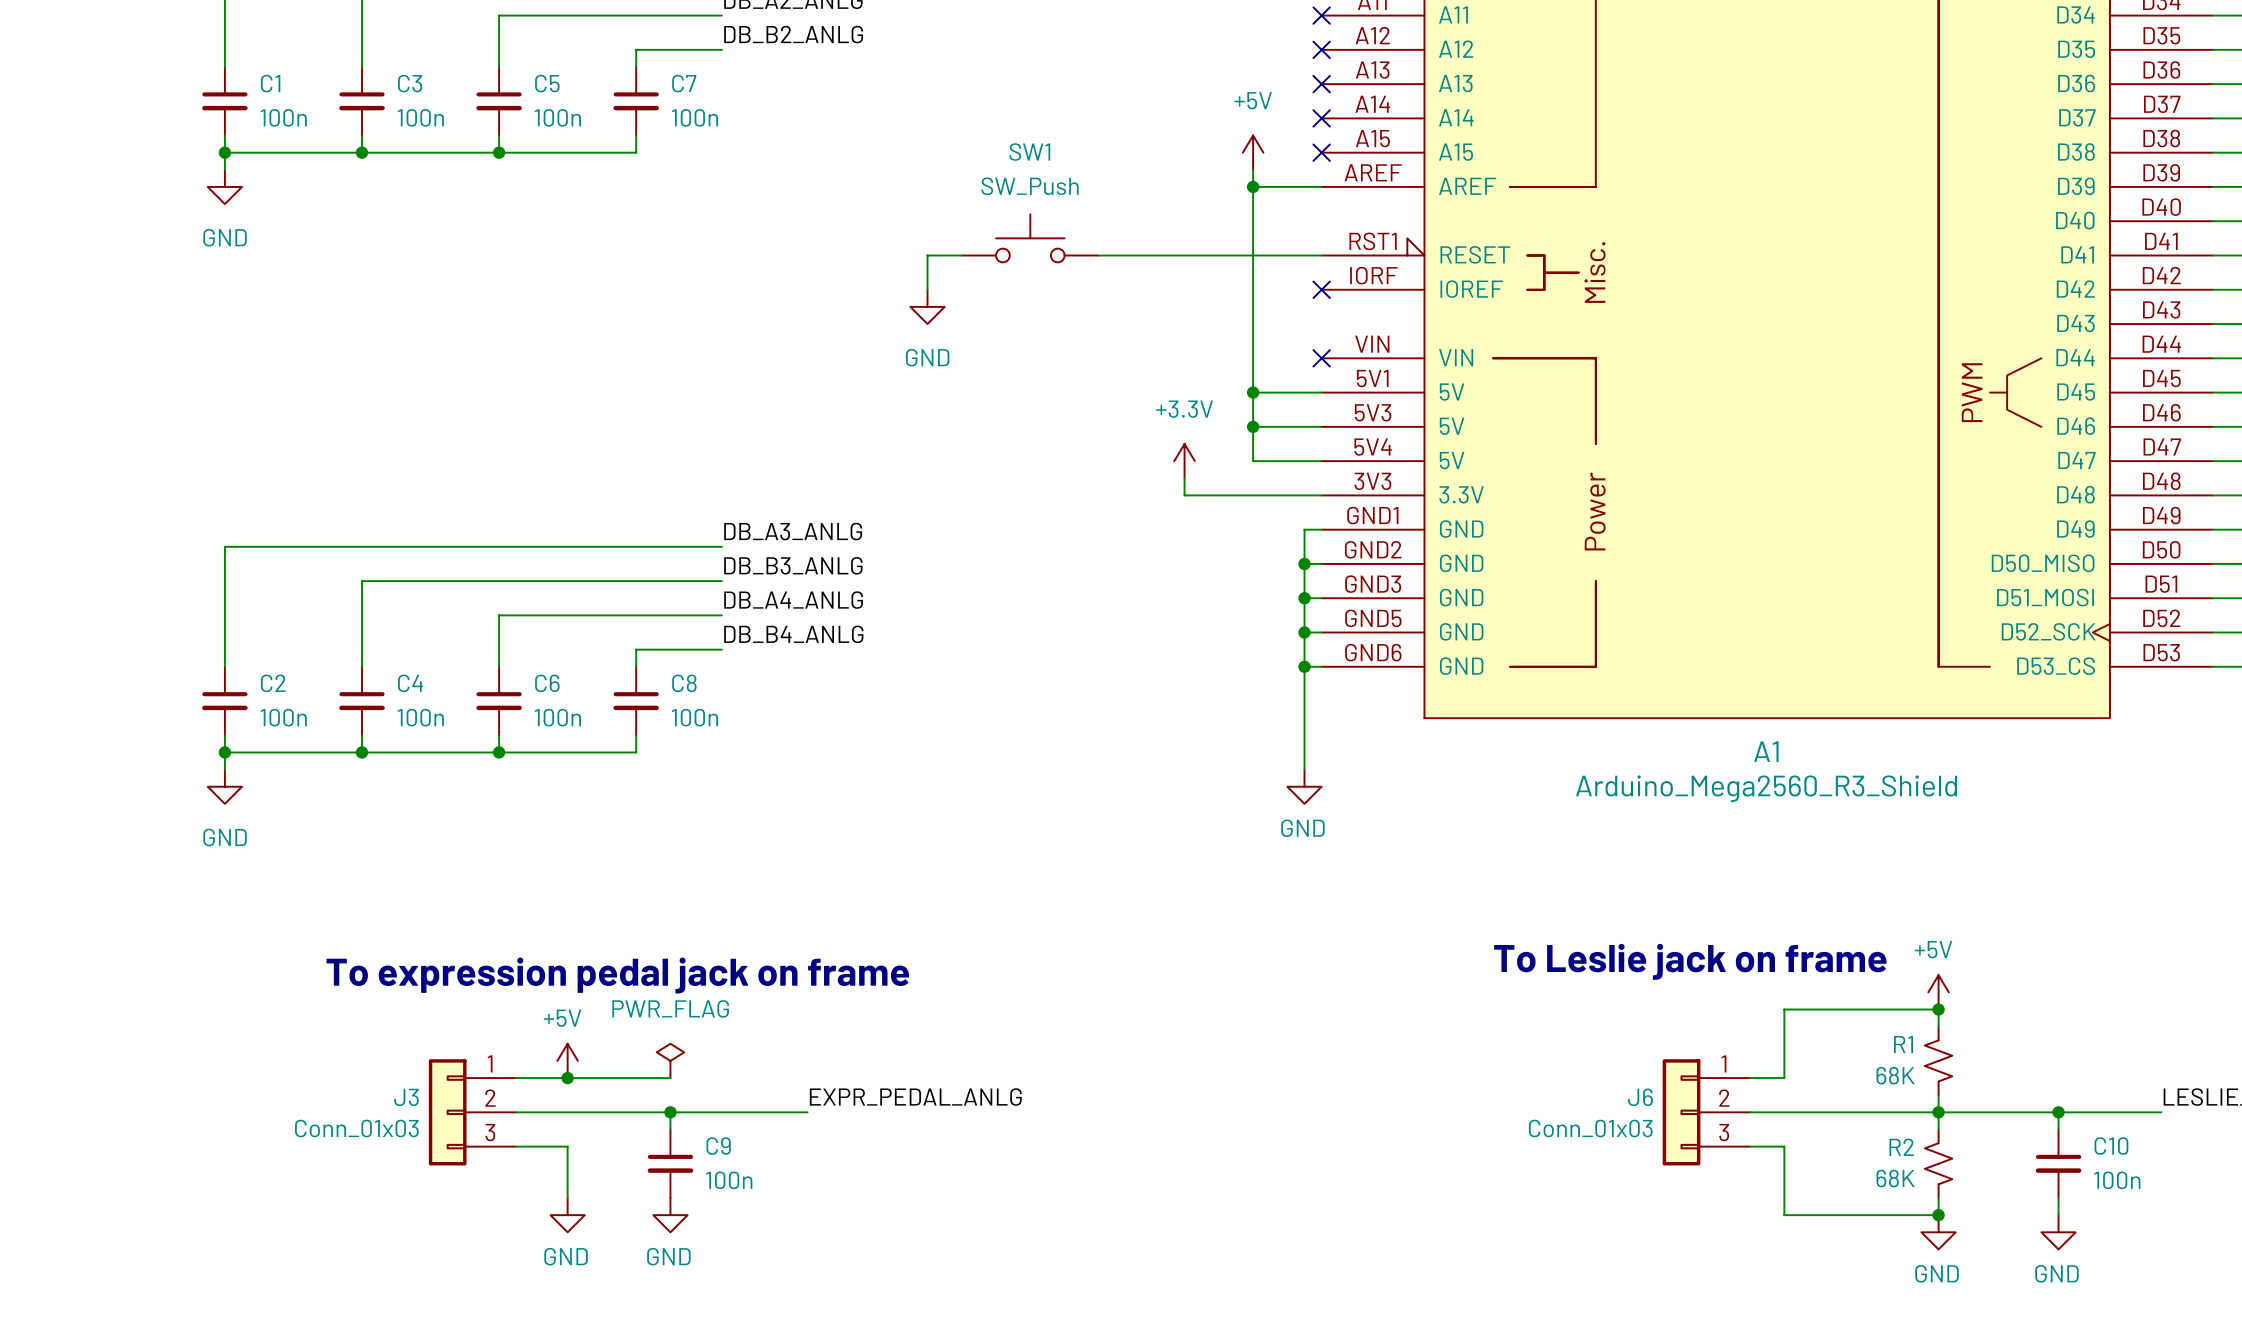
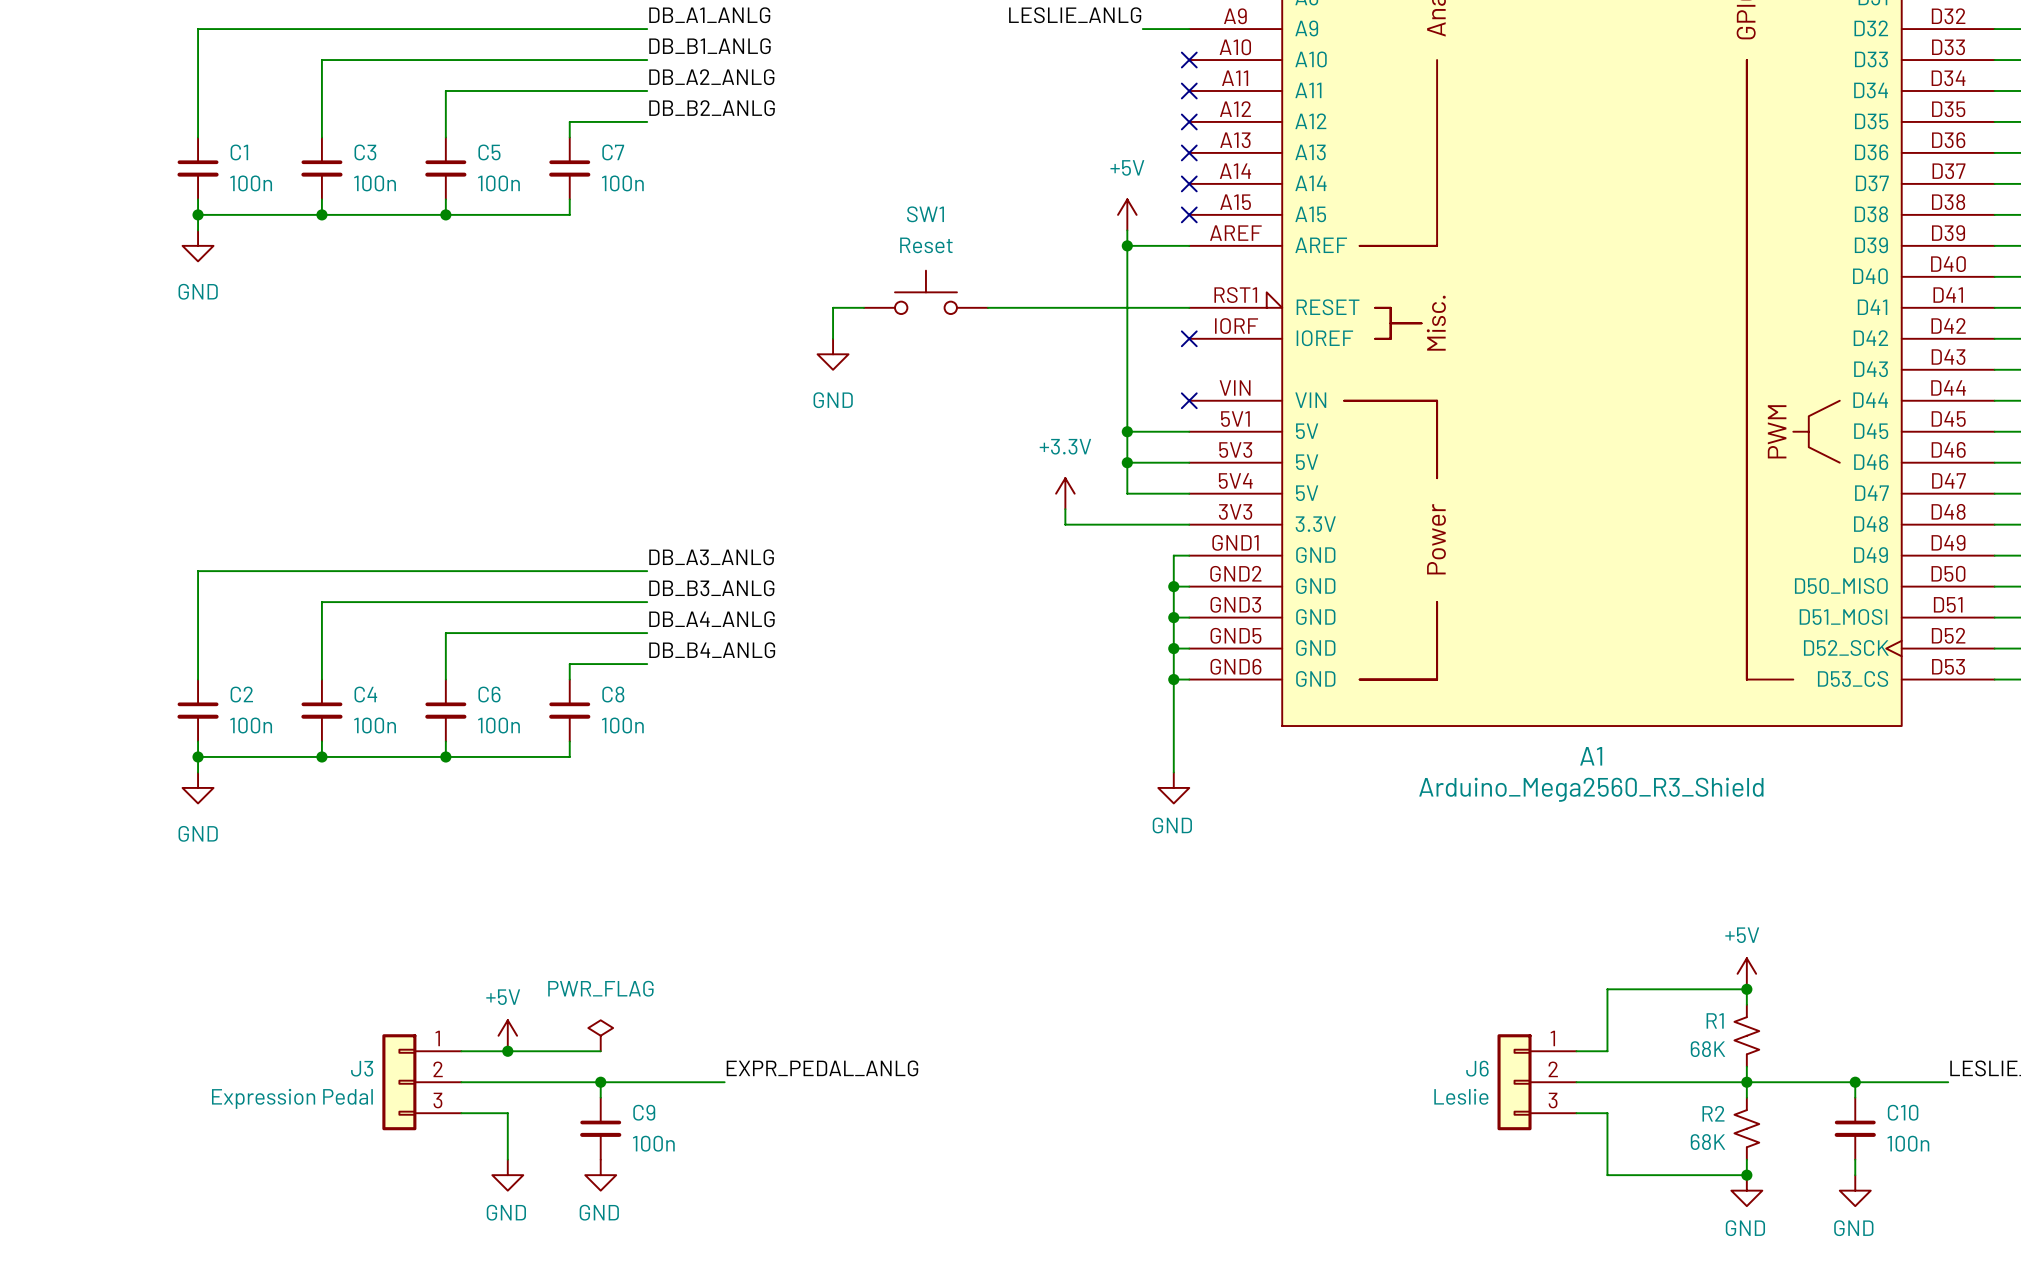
SW1 value: SW_Push (1030, 186) -> Reset (926, 245)
text: To Leslie jack on frame (1690, 961) -> none
text: To expression pedal jack on frame (617, 975) -> none
J3 value: Conn_01x03 (356, 1128) -> Expression Pedal (292, 1098)
J6 value: Conn_01x03 (1590, 1128) -> Leslie (1461, 1096)

